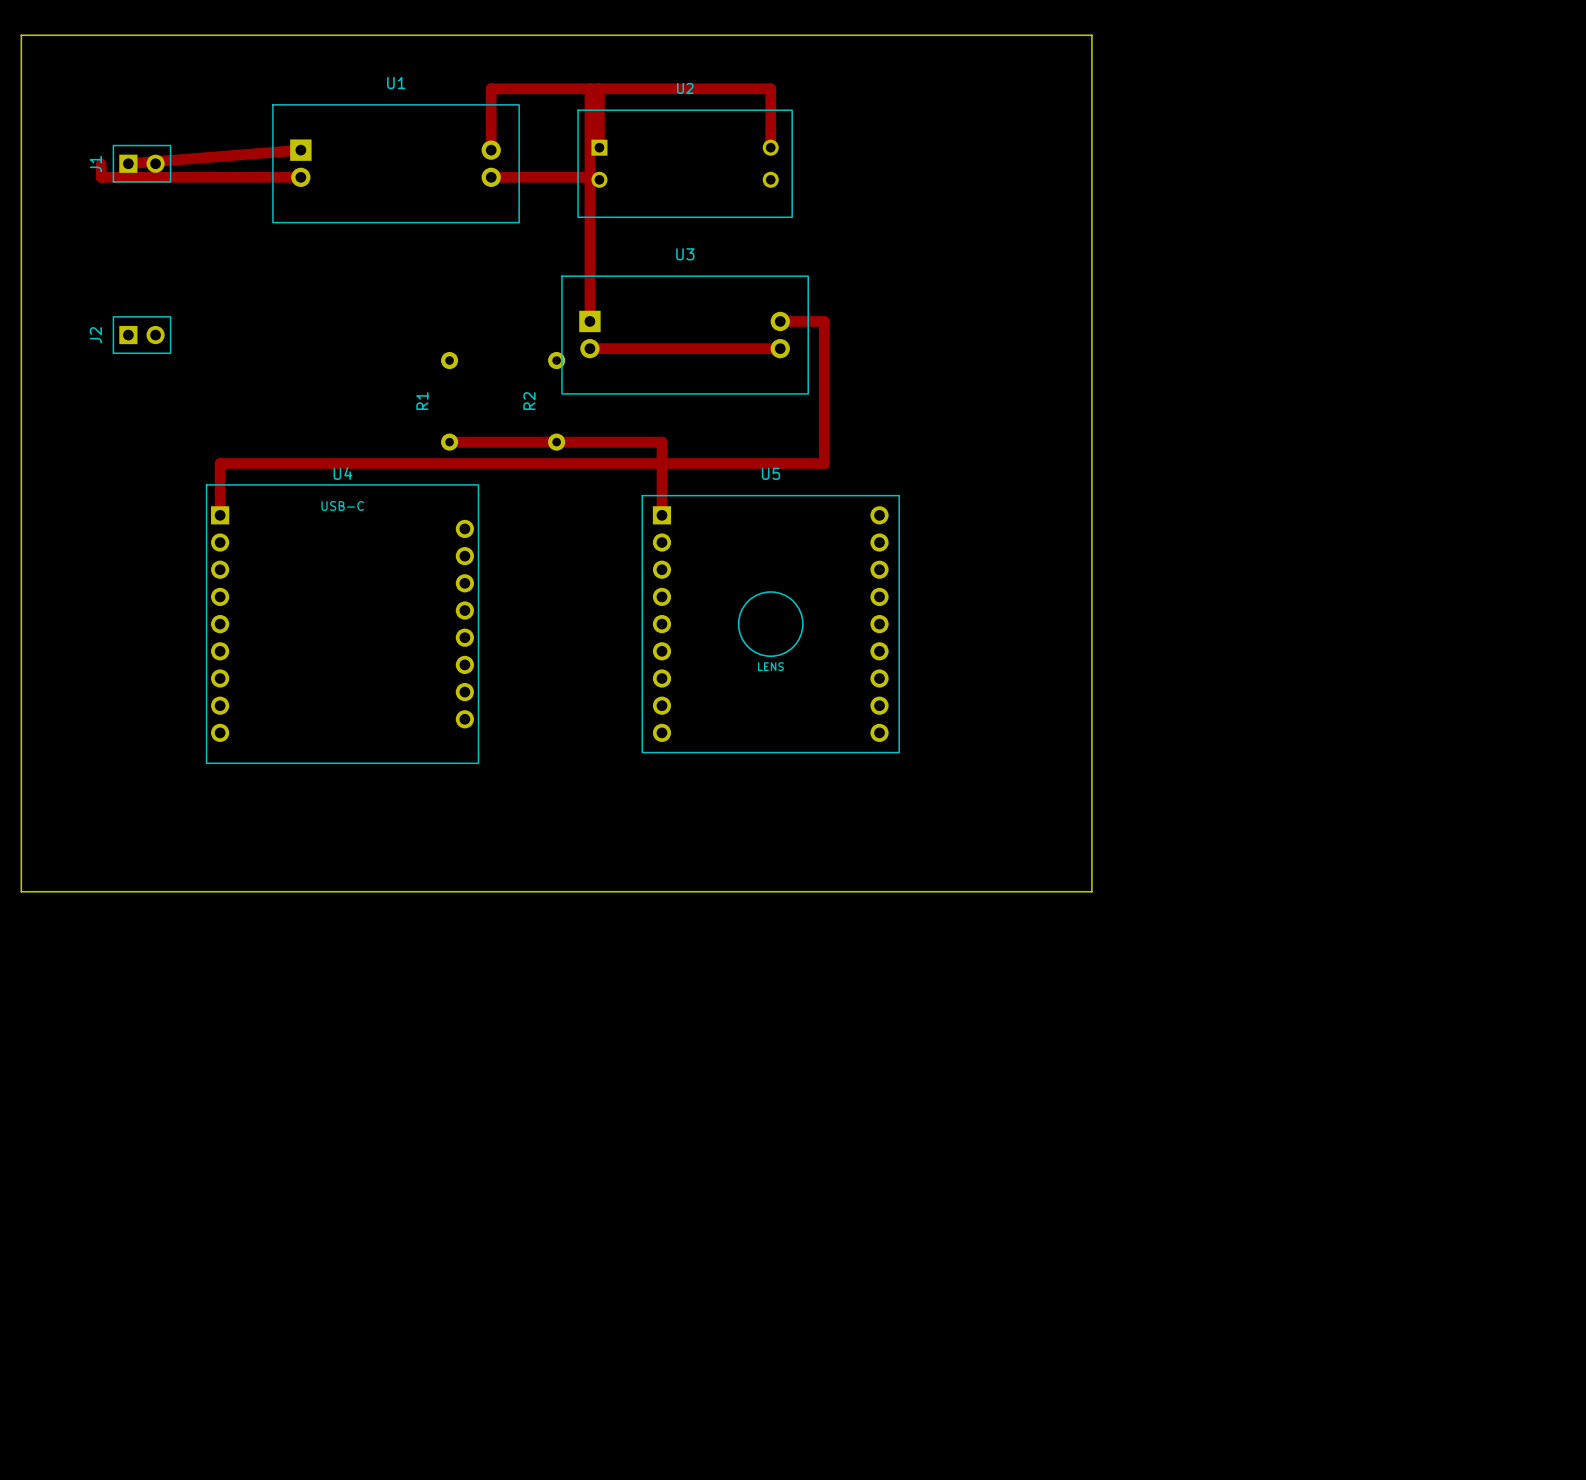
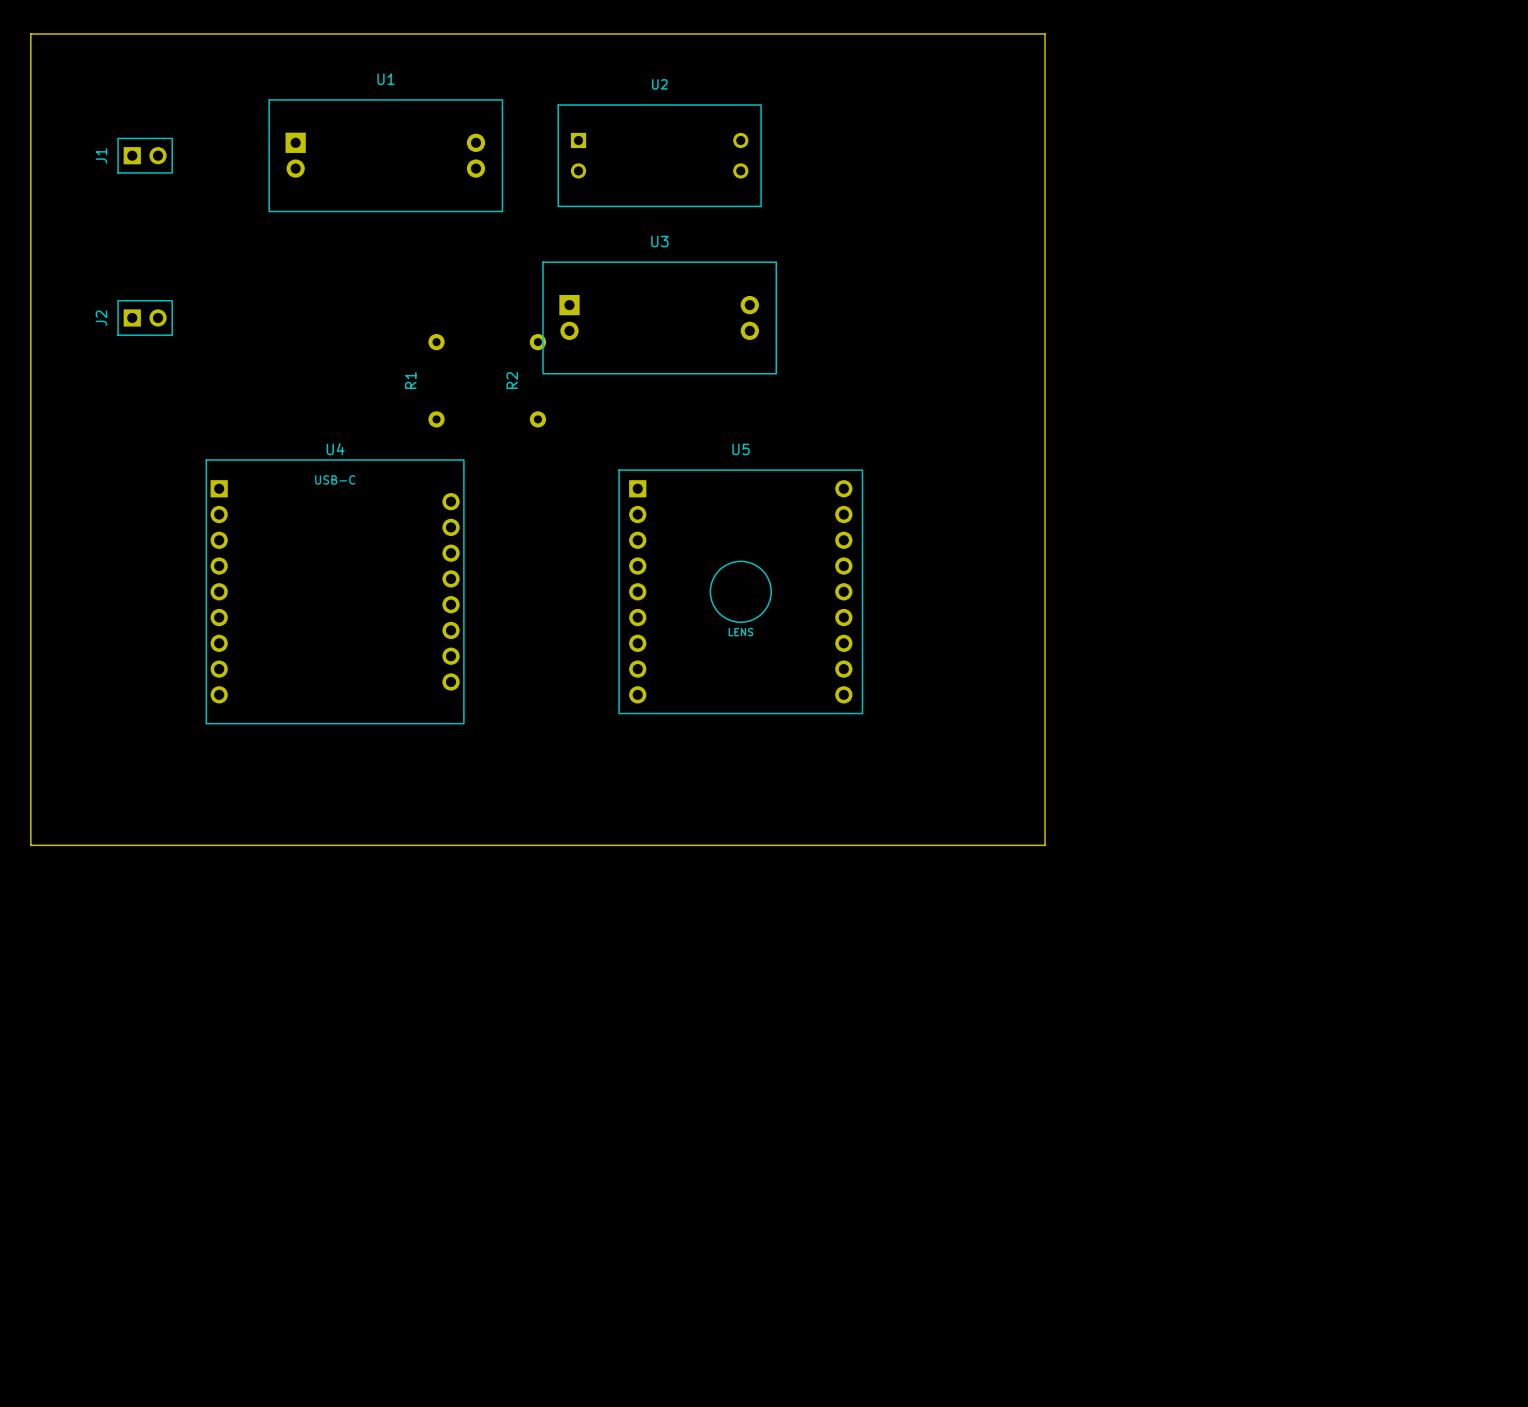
top track: (589, 88) (589, 321) -> none
top track: (599, 88) (599, 147) -> none
top track: (770, 147) (770, 88) (491, 88) (491, 150) -> none
top track: (300, 150) (128, 163) -> none
top track: (101, 163) (101, 177) (300, 177) -> none
top track: (491, 177) (599, 177) (599, 179) -> none
top track: (780, 321) (824, 321) (824, 463) (220, 463) (220, 515) -> none
top track: (589, 348) (780, 348) -> none
top track: (449, 442) (661, 442) (661, 515) -> none

